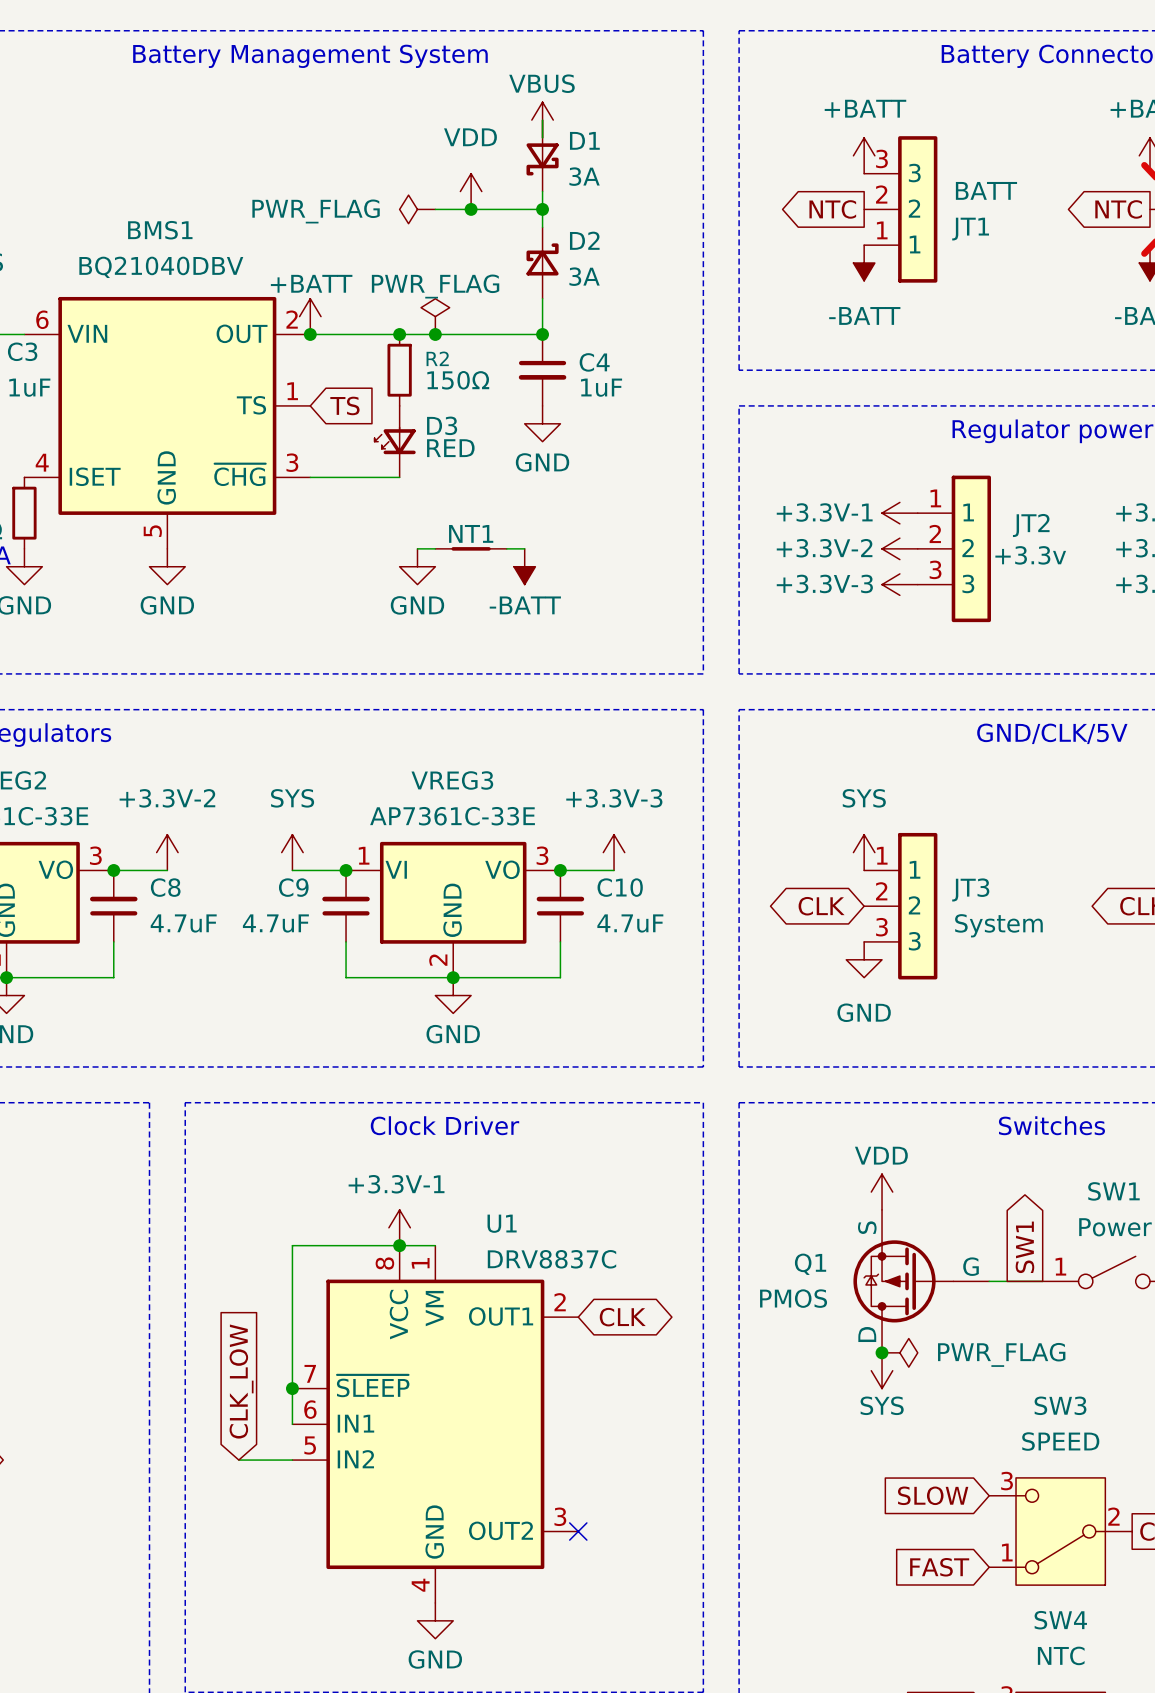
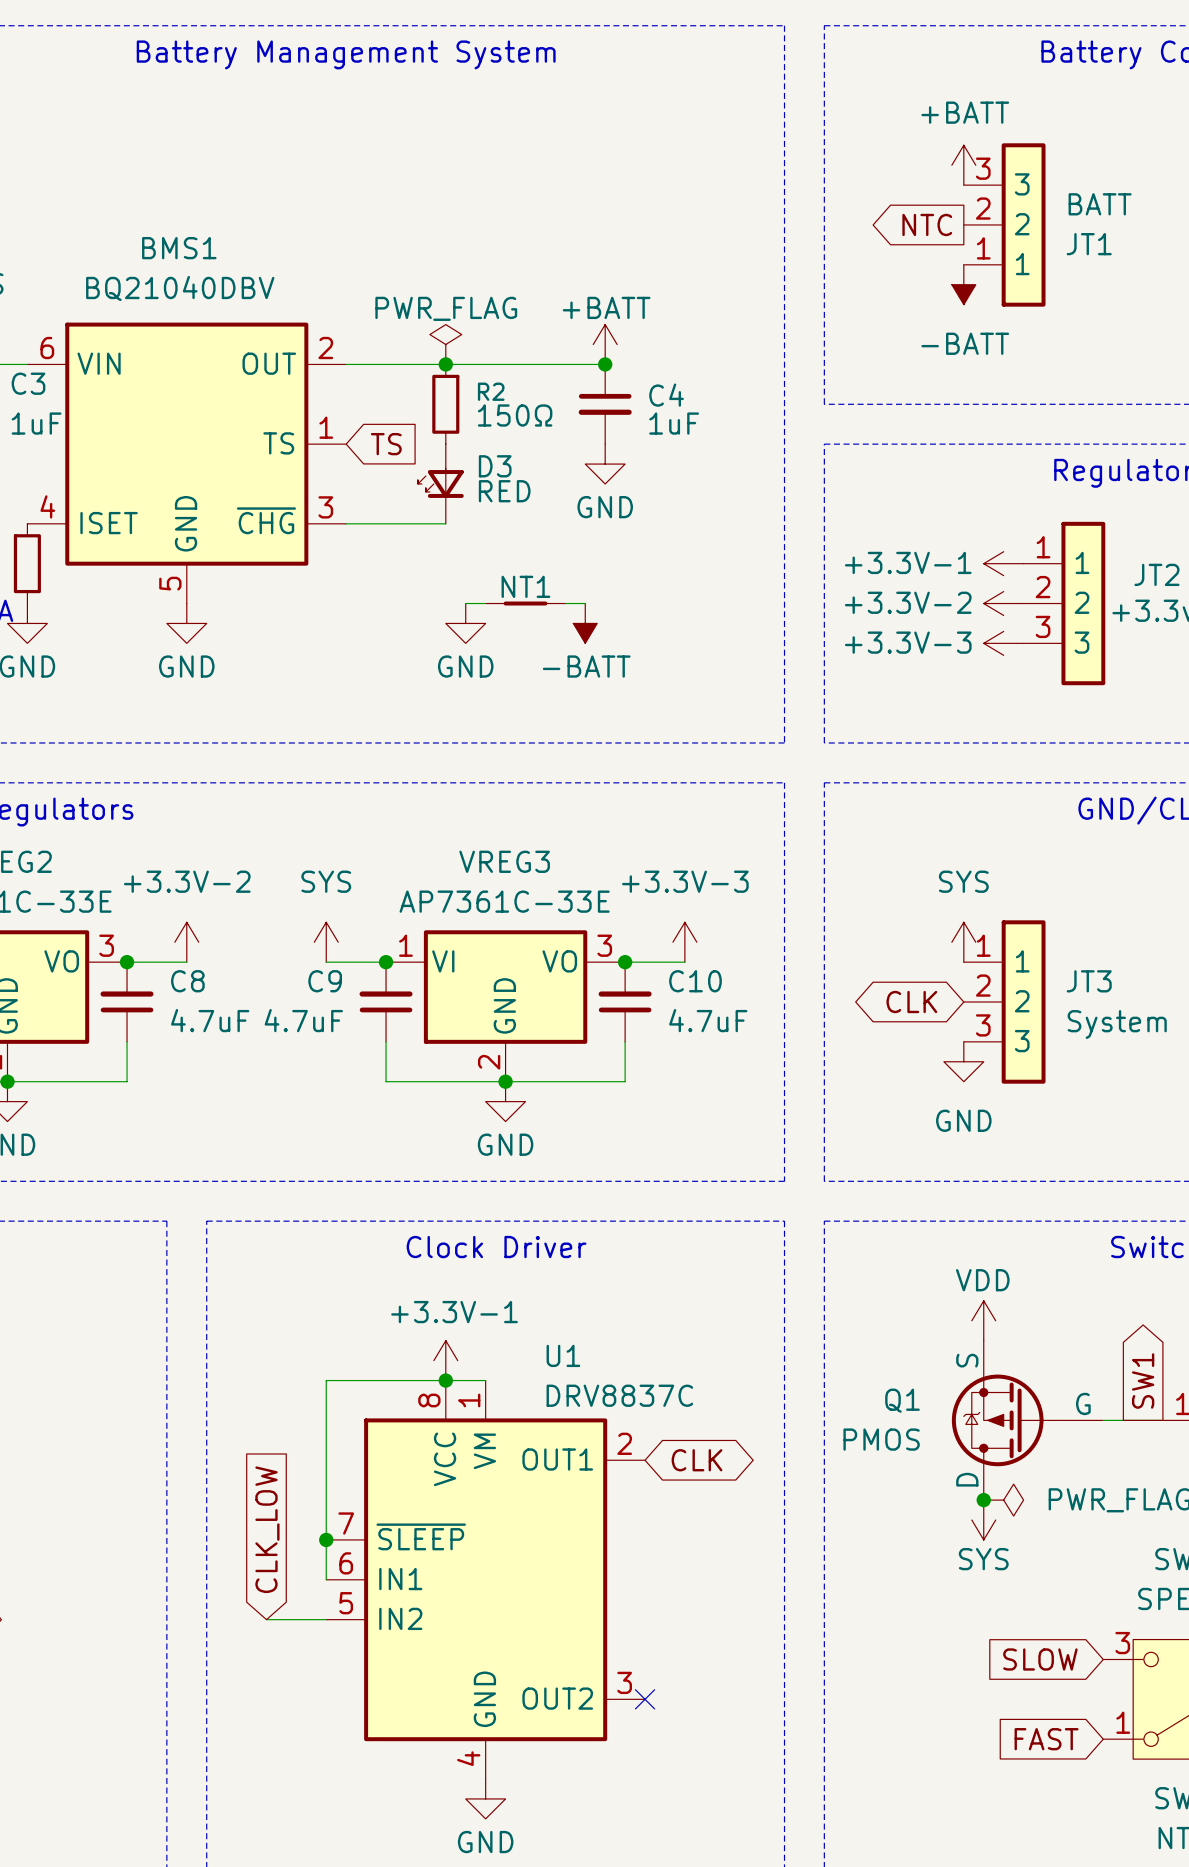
wire: (542, 120) (542, 137) -> none
power symbol: VBUS (542, 120) -> none
D1: 3A (542, 155) -> none
power symbol: VDD (471, 191) -> none
wire: (542, 191) (542, 227) -> none
power symbol: PWR_FLAG (417, 209) -> none
wire: (435, 209) (542, 209) -> none
junction: (471, 209) -> none
junction: (542, 209) -> none
D2: 3A (542, 263) -> none
power symbol position: +BATT (310, 316) -> +BATT (605, 344)
power symbol position: PWR_FLAG (435, 316) -> PWR_FLAG (445, 344)
junction: (310, 334) -> none
junction: (435, 334) -> none

